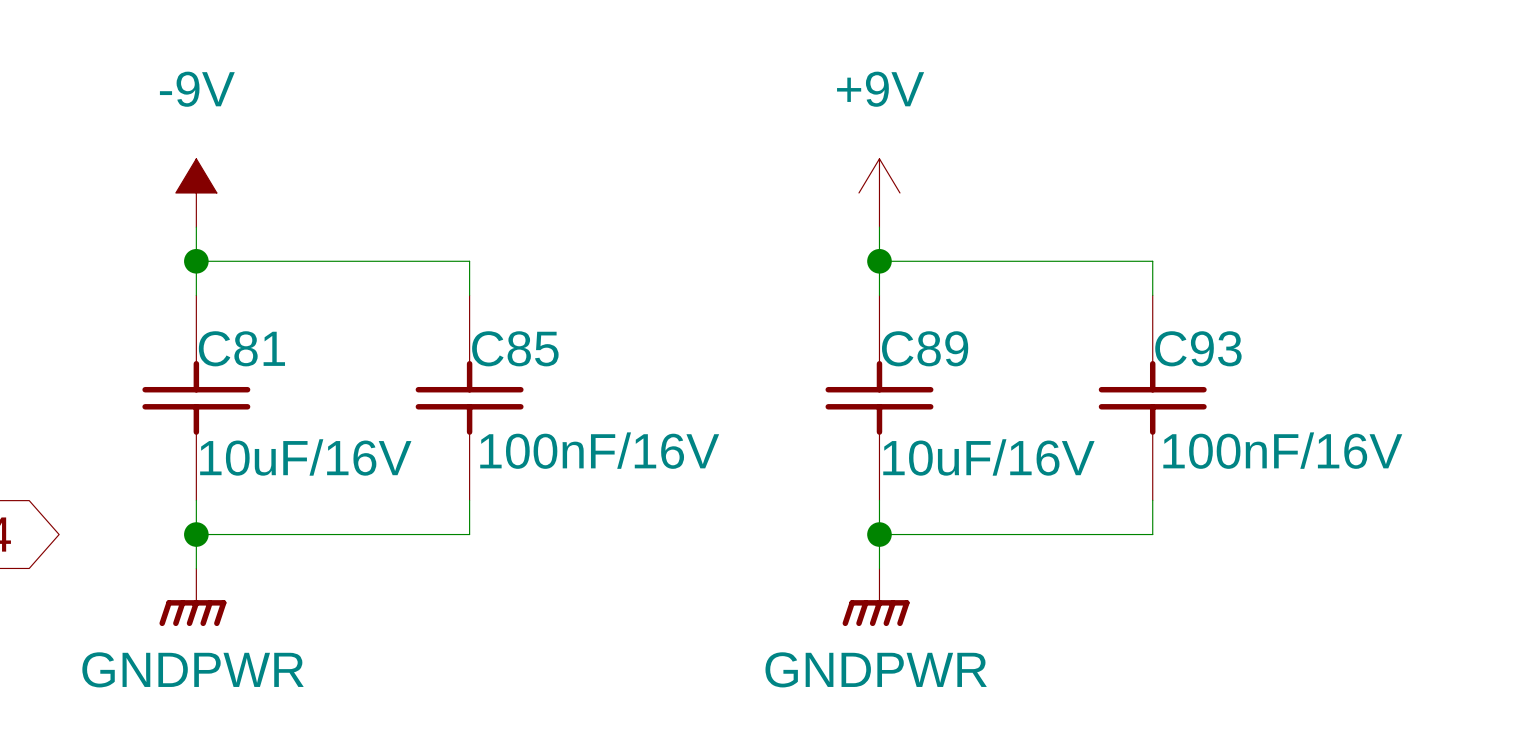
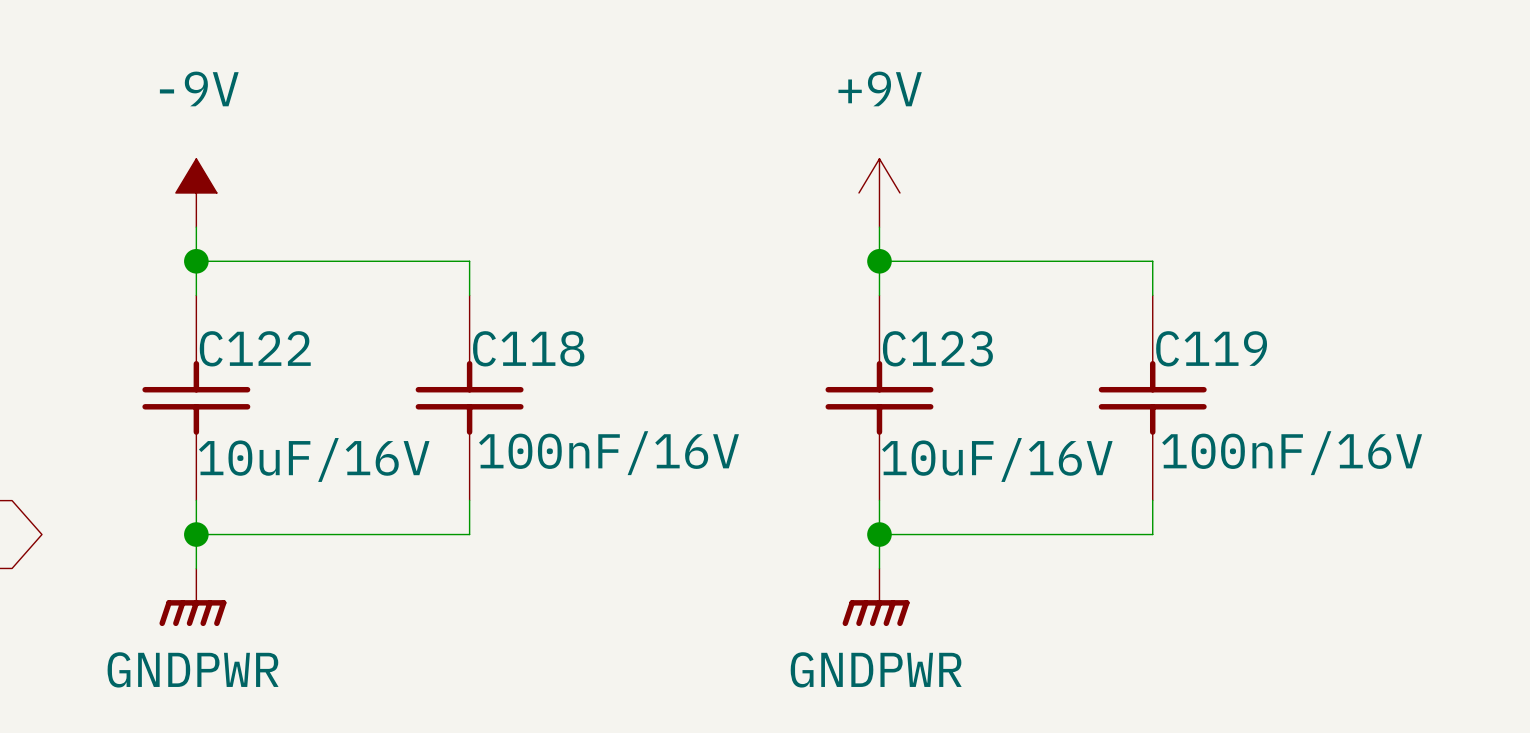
C81 name: C81 (241, 348) -> C122 (255, 348)
C85 name: C85 (515, 348) -> C118 (528, 348)
C89 name: C89 (925, 348) -> C123 (937, 348)
C93 name: C93 (1198, 348) -> C119 (1211, 348)

